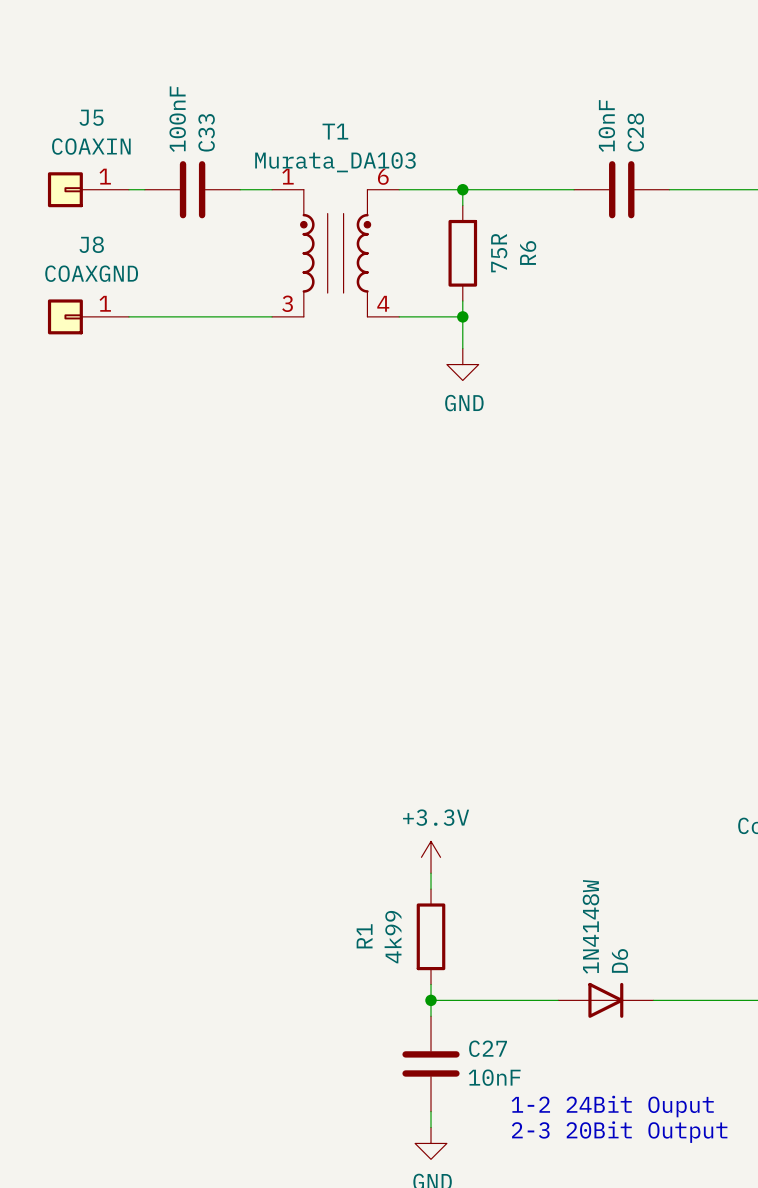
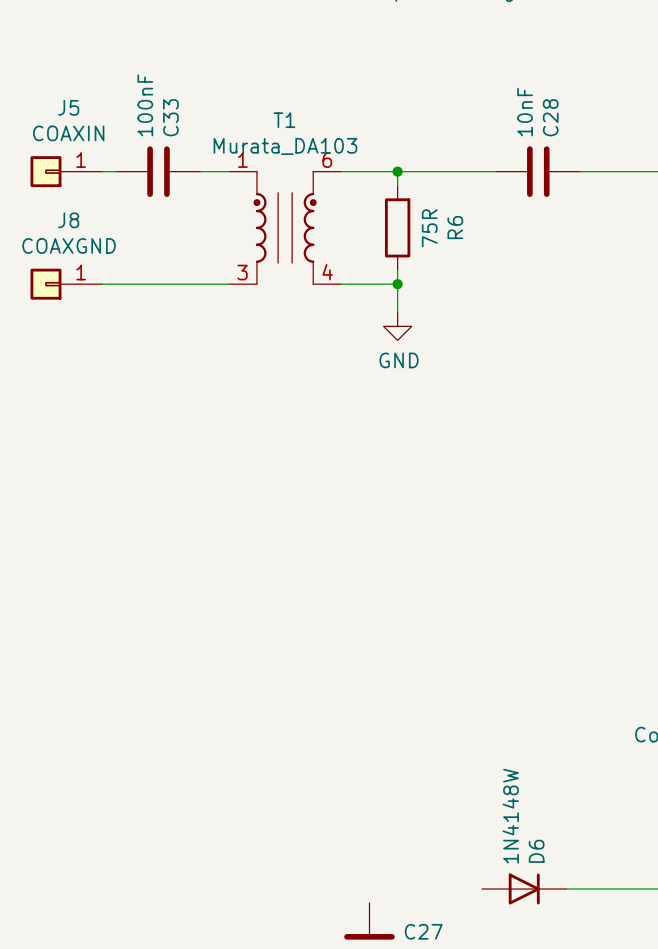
power symbol: +3.3V (431, 857) -> none
wire: (431, 873) (431, 889) -> none
R1: 4k99 (431, 936) -> none
wire: (431, 984) (431, 1016) -> none
wire: (431, 1000) (558, 1000) -> none
junction: (431, 1000) -> none

